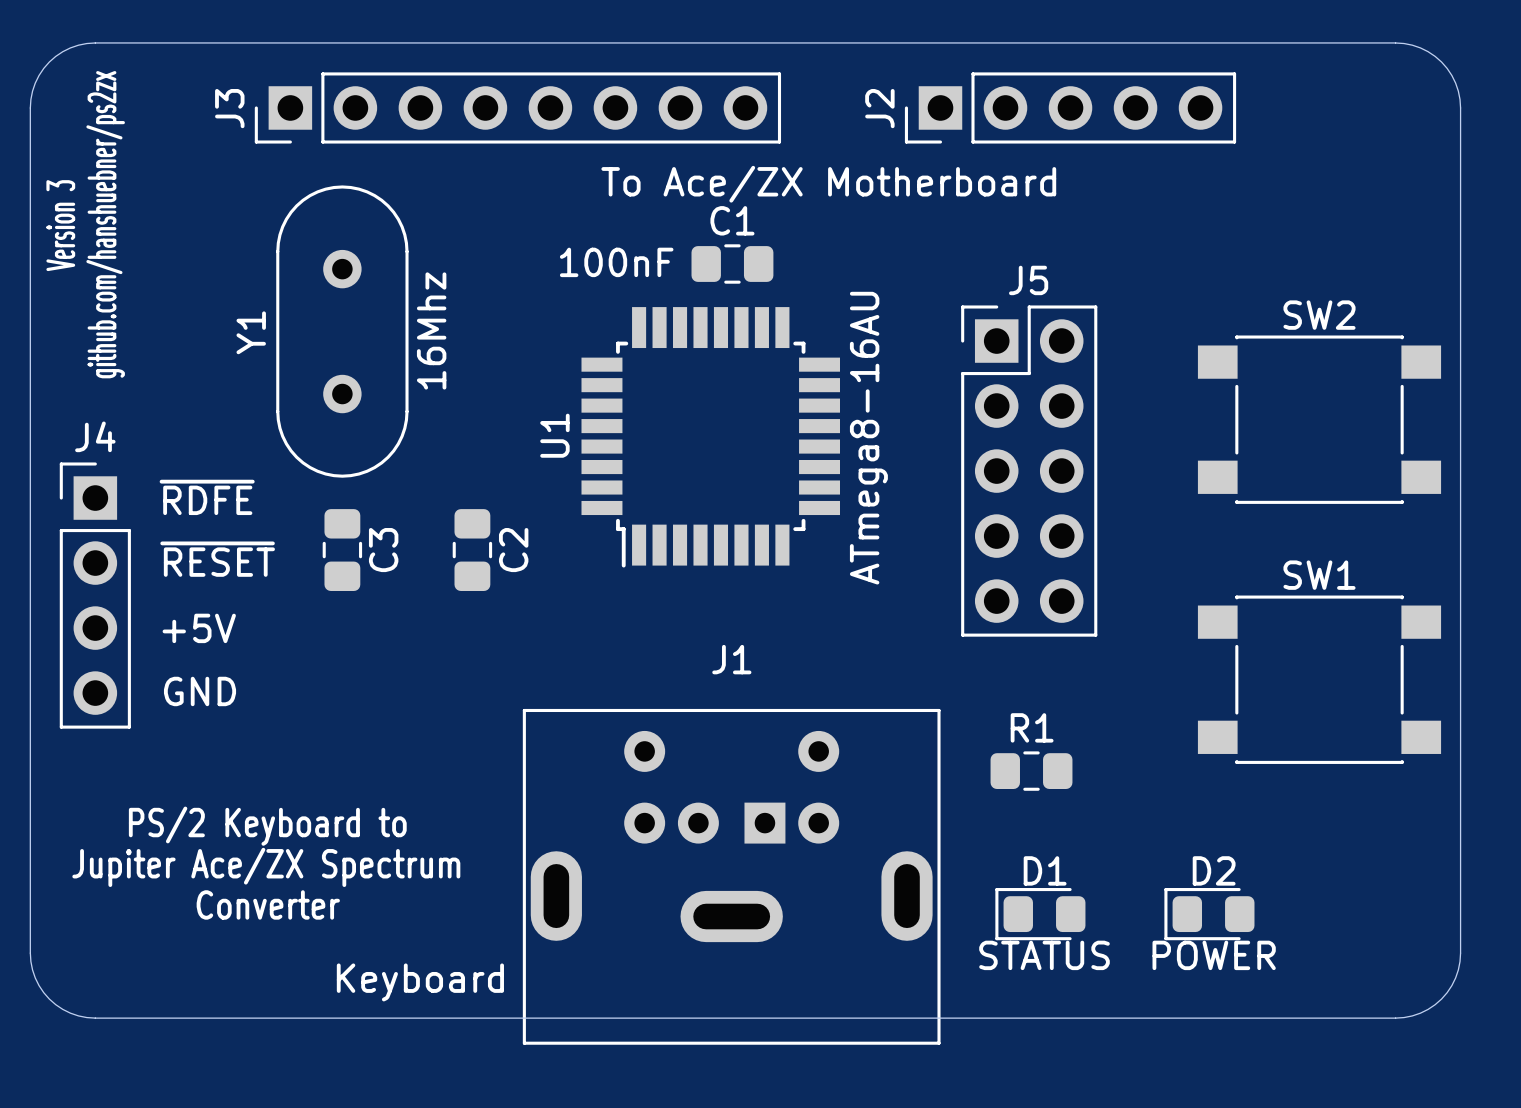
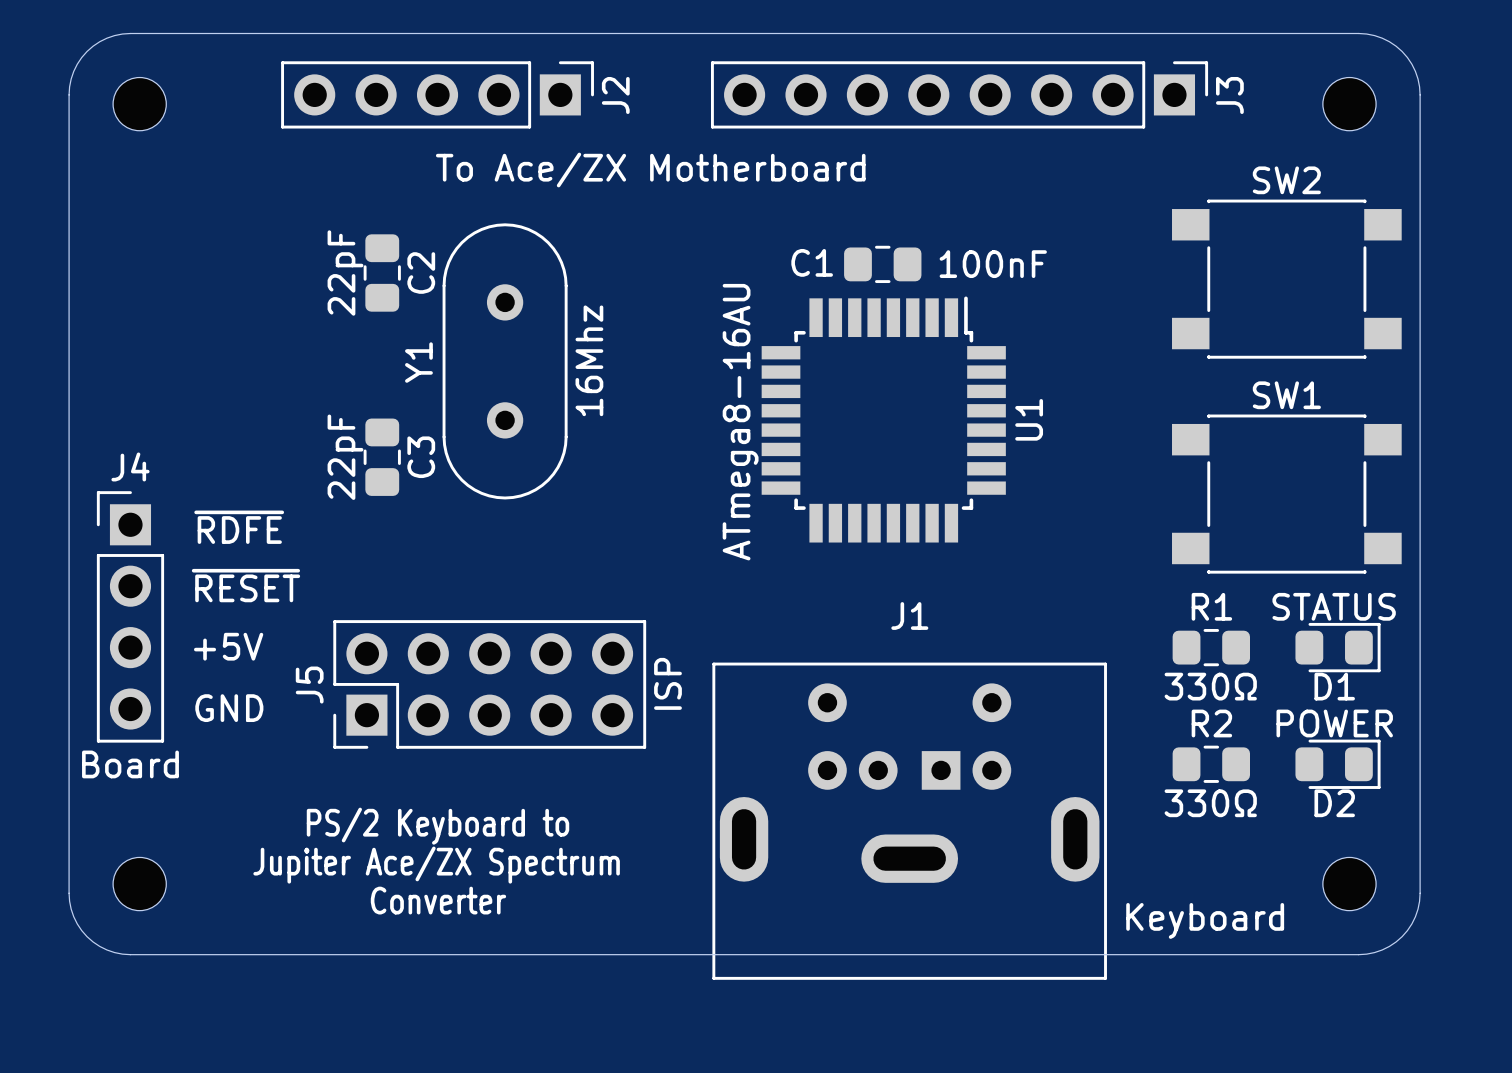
J3 rotation: 0° (517, 107) -> 180° (959, 94)
J3 position: (517, 107) -> (959, 94)
J2 rotation: 0° (1070, 107) -> 180° (437, 94)
J2 position: (1070, 107) -> (437, 94)
part: none -> (139, 104)
part: none -> (1349, 104)
text position: To Ace/ZX Motherboard (828, 184) -> To Ace/ZX Motherboard (650, 170)
C1 name position: C1 (732, 220) -> C1 (812, 262)
text: github.com/hanshuebner/ps2zx (105, 224) -> none
text: Version 3 (60, 225) -> none
C1 value position: 100nF (616, 262) -> 100nF (993, 264)
C1 position: (732, 264) -> (882, 264)
C2 value: none -> 22pF (345, 273)
Y1 position: (342, 331) -> (505, 361)
SW2 position: (1319, 419) -> (1286, 279)
U1 rotation: 0° (710, 437) -> 180° (883, 419)
U1 position: (710, 437) -> (883, 419)
J5 rotation: 0° (1029, 471) -> 90° counterclockwise (489, 684)
J5 position: (1029, 471) -> (489, 684)
C3 value: none -> 22pF (345, 457)
text position: ~{RDFE} (207, 497) -> ~{RDFE} (239, 527)
C3 position: (342, 550) -> (382, 457)
C2 position: (472, 550) -> (382, 273)
text position: ~{RESET} (217, 559) -> ~{RESET} (245, 585)
J4 position: (95, 595) -> (130, 616)
text position: +5V (199, 628) -> +5V (228, 646)
SW1 position: (1319, 679) -> (1286, 494)
text position: GND (200, 691) -> GND (229, 708)
J5 value: none -> ISP (667, 683)
R1 value: none -> 330Ω (1210, 686)
R1 position: (1031, 771) -> (1211, 647)
J4 value: none -> Board (130, 764)
R2: none -> 330Ω (1211, 764)
text position: PS/2 Keyboard to (267, 826) -> PS/2 Keyboard to (437, 826)
text position: Jupiter Ace/ZX Spectrum (266, 867) -> Jupiter Ace/ZX Spectrum (436, 865)
J1 position: (731, 876) -> (909, 821)
text position: Converter (268, 904) -> Converter (438, 900)
D1 rotation: 0° (1040, 914) -> 180° (1338, 647)
D1 position: (1040, 914) -> (1338, 647)
D2 rotation: 0° (1209, 914) -> 180° (1338, 764)
D2 position: (1209, 914) -> (1338, 764)
part: none -> (139, 884)
part: none -> (1349, 884)
J1 value position: Keyboard (420, 982) -> Keyboard (1205, 920)

